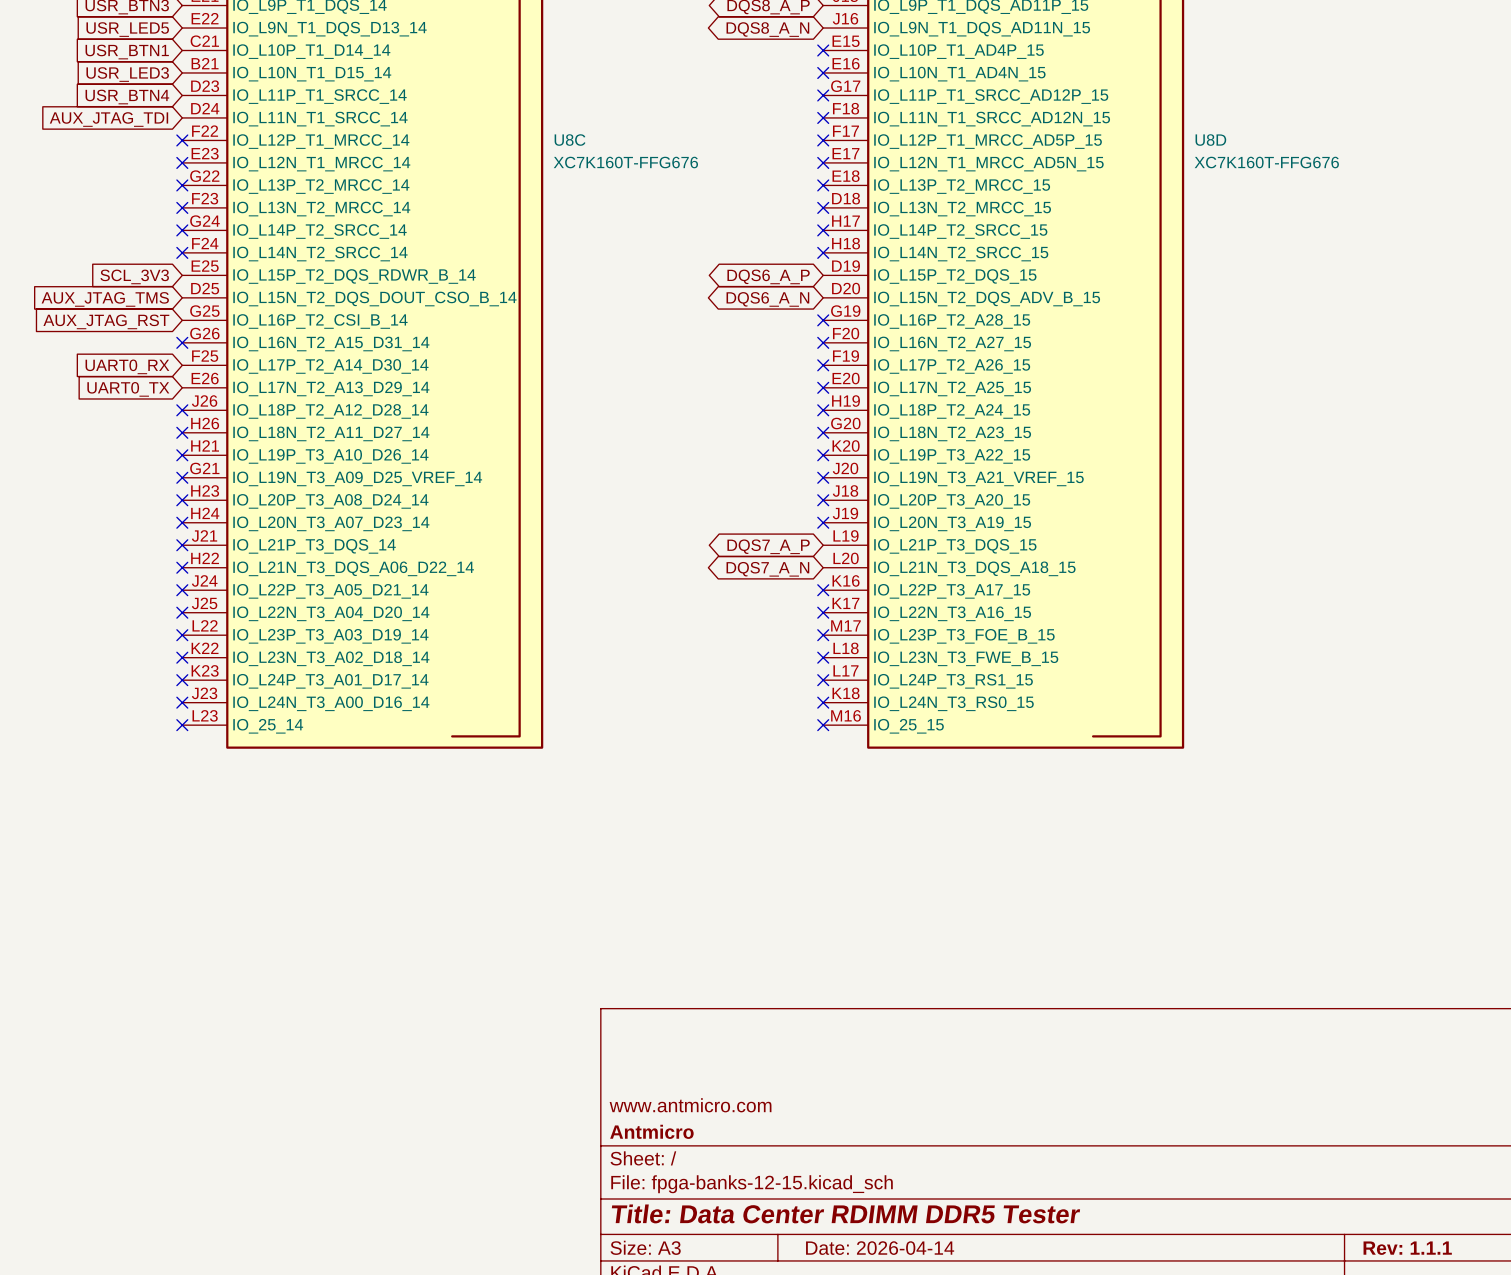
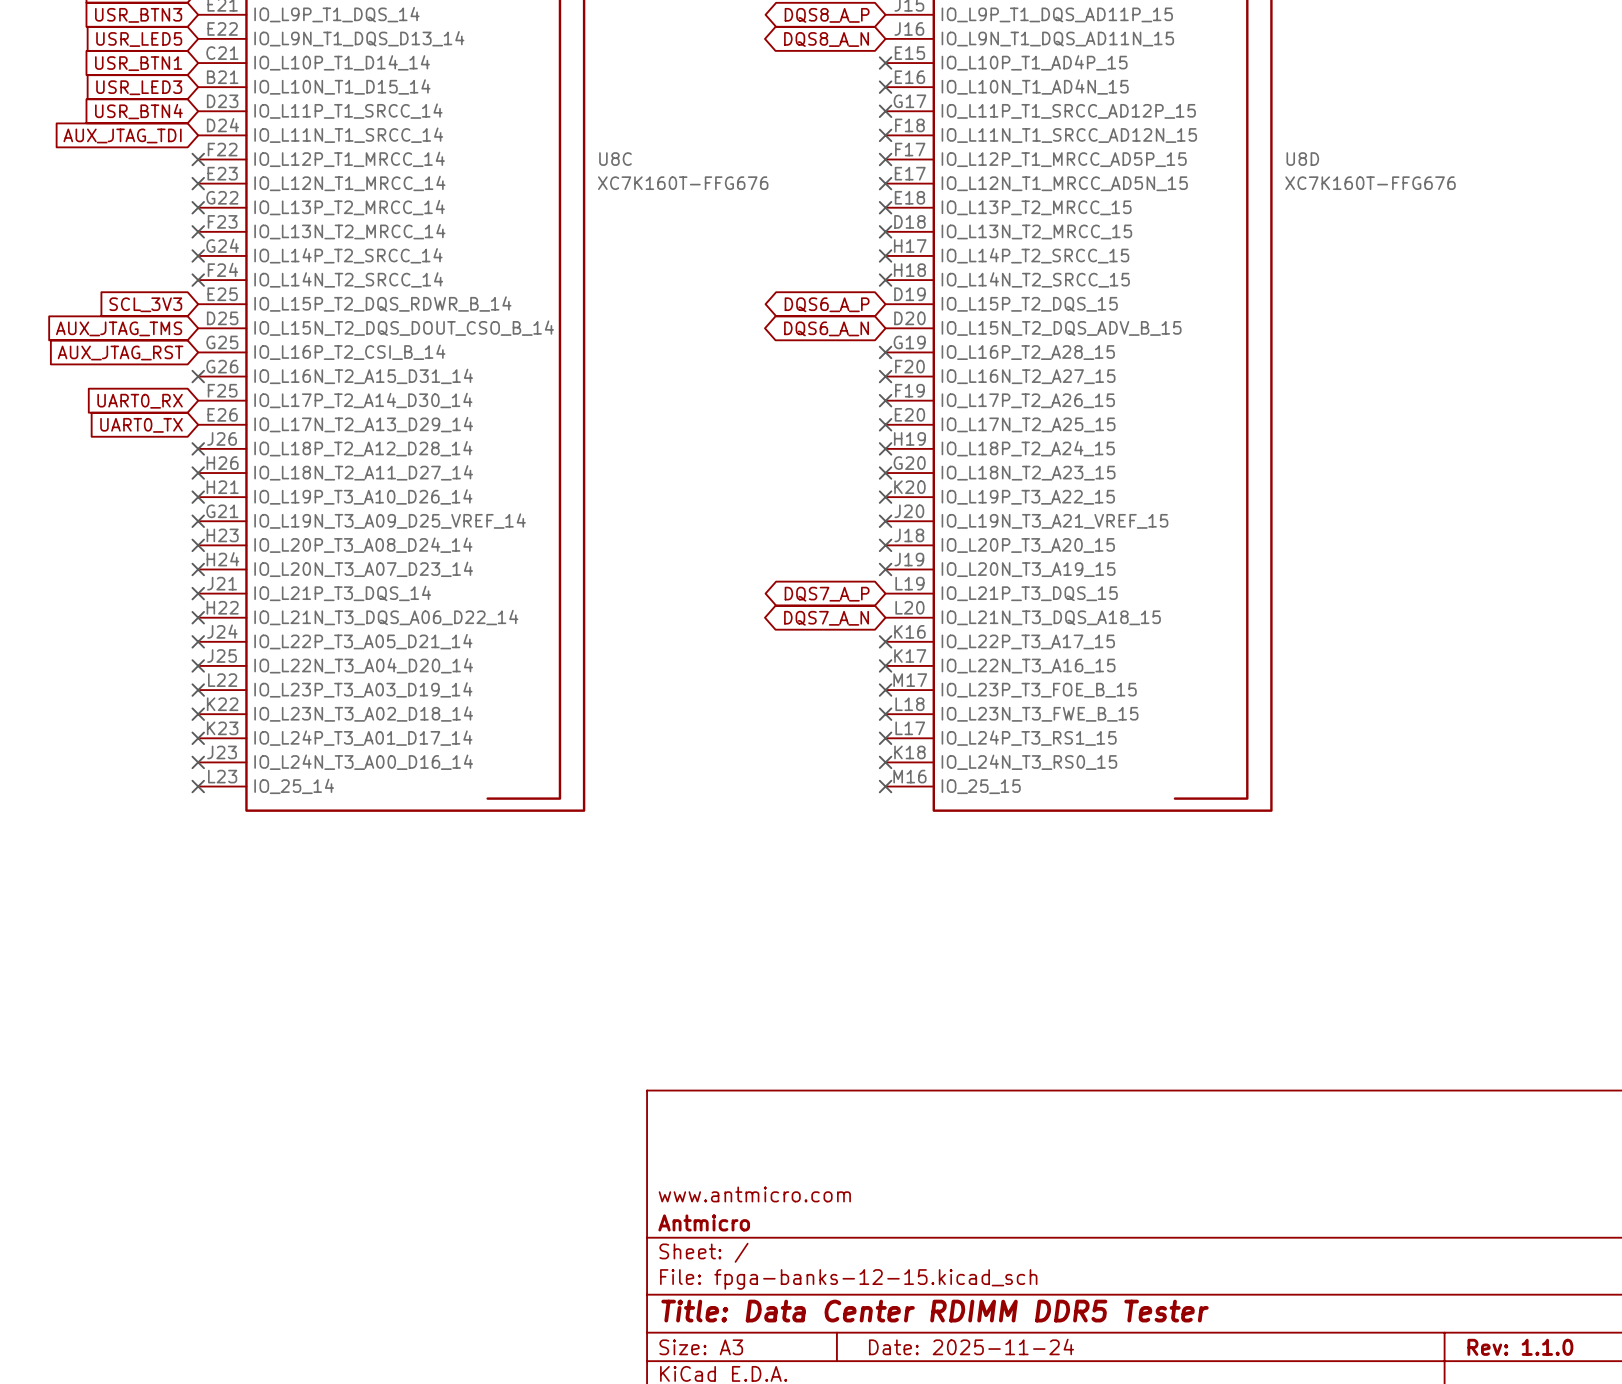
title block: Date: 2026-04-14 (880, 1248) -> Date: 2025-11-24 (971, 1346)
title block: Rev: 1.1.1 (1407, 1248) -> Rev: 1.1.0 (1520, 1347)

